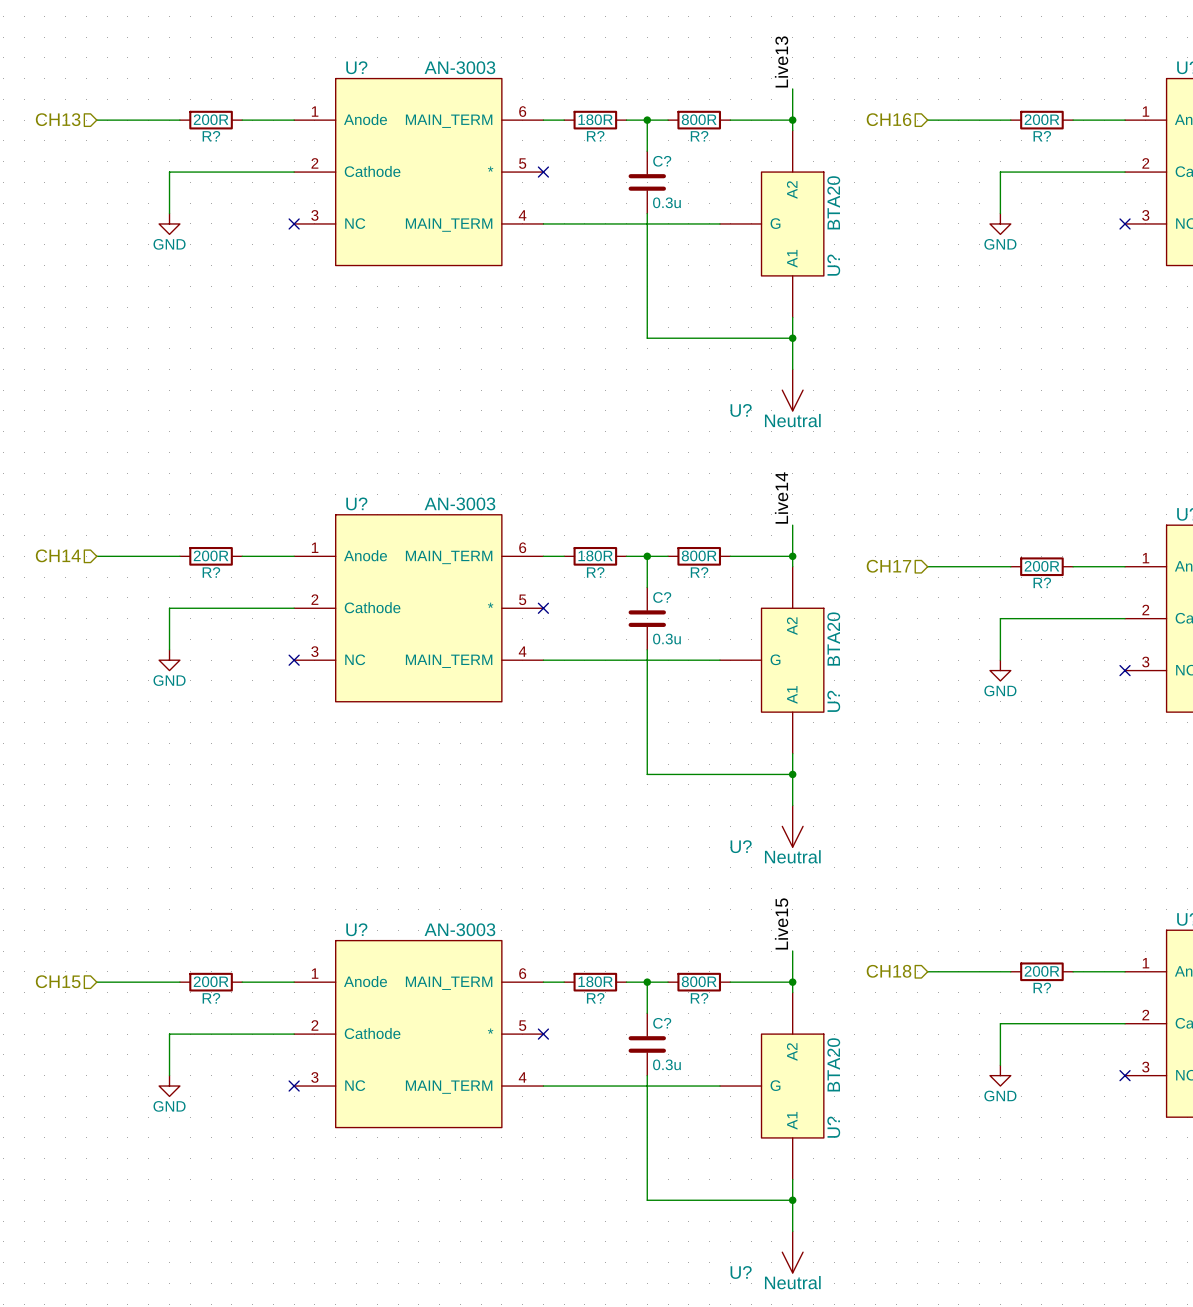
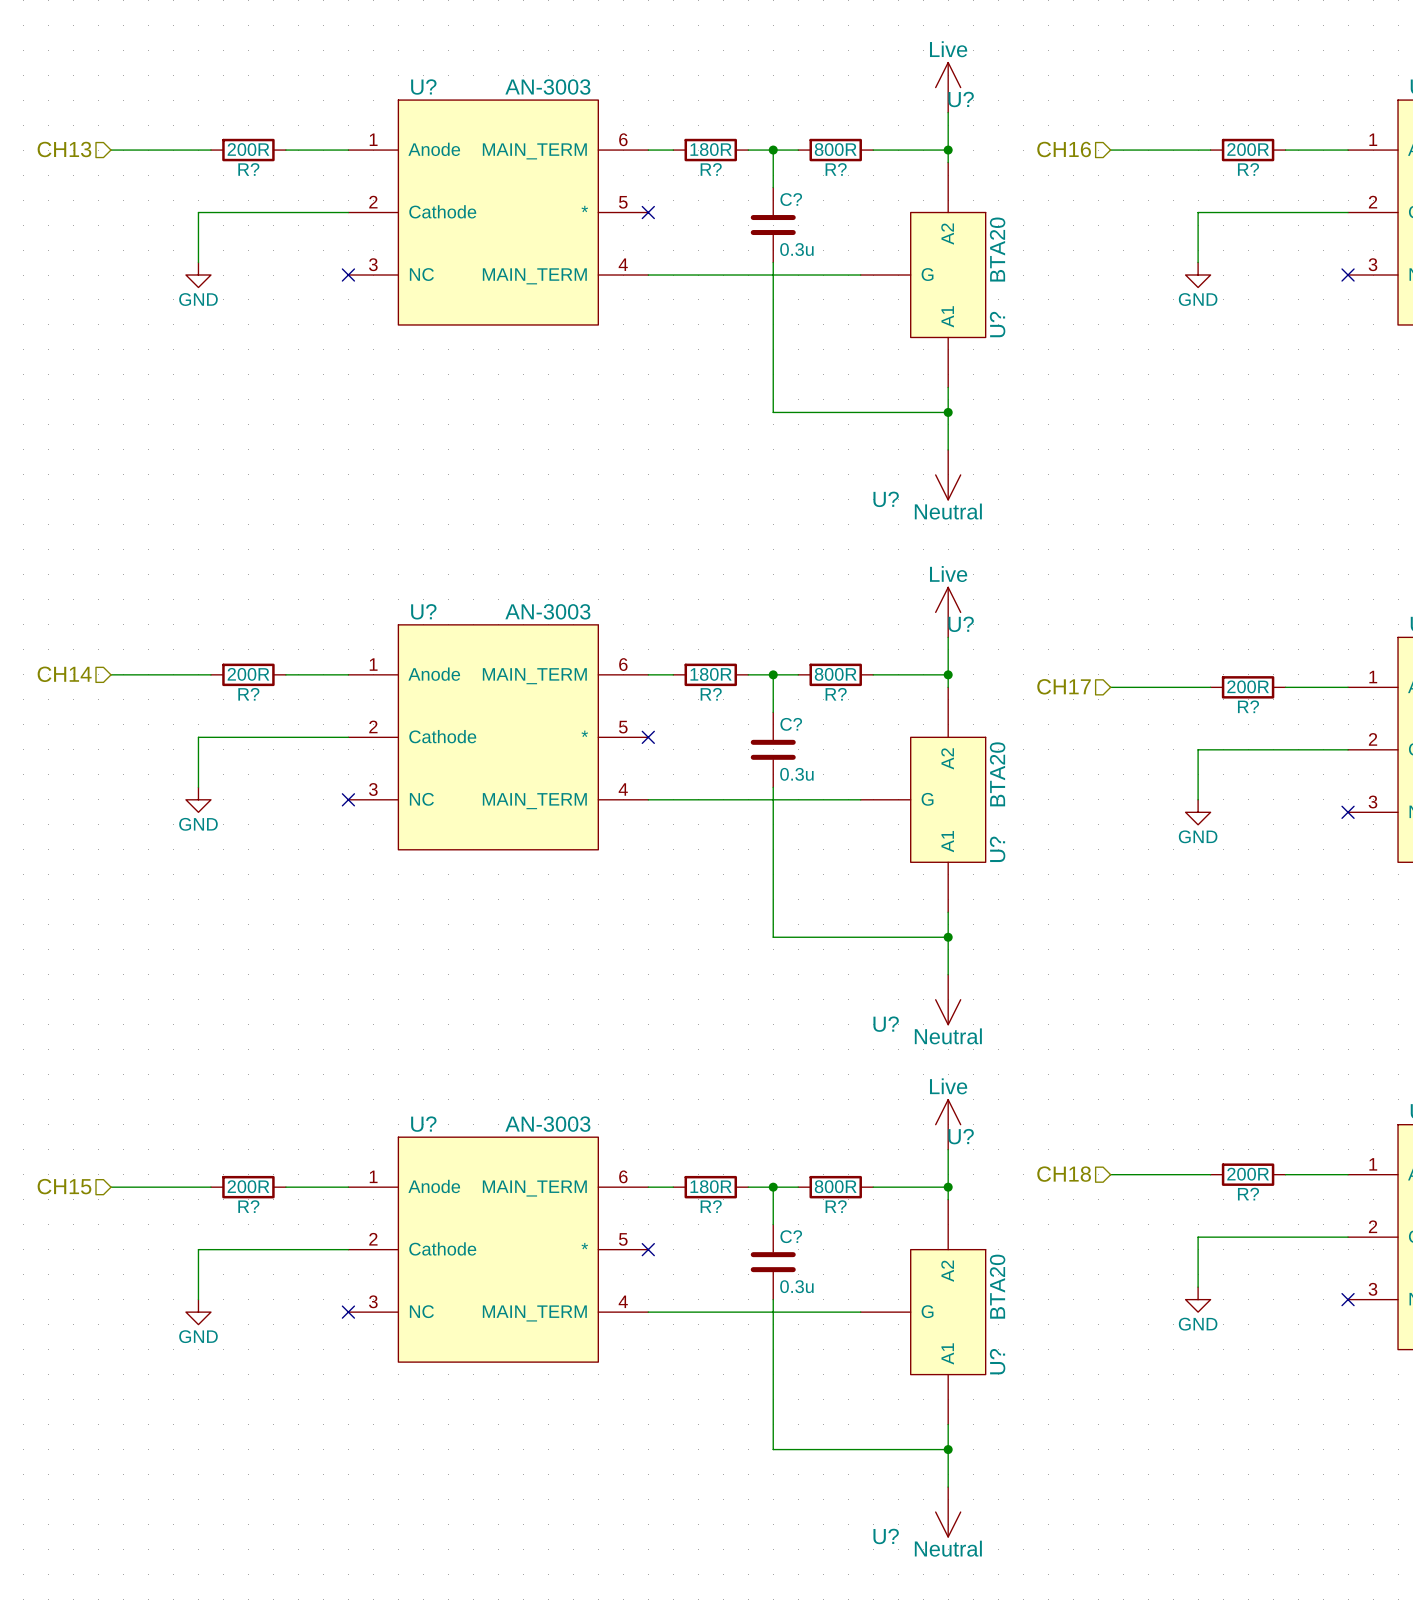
label: Live13 (781, 61) -> none
U?: none -> Live (948, 87)
label: Live14 (781, 498) -> none
U?: none -> Live (948, 612)
label: Live15 (781, 923) -> none
U?: none -> Live (948, 1124)

